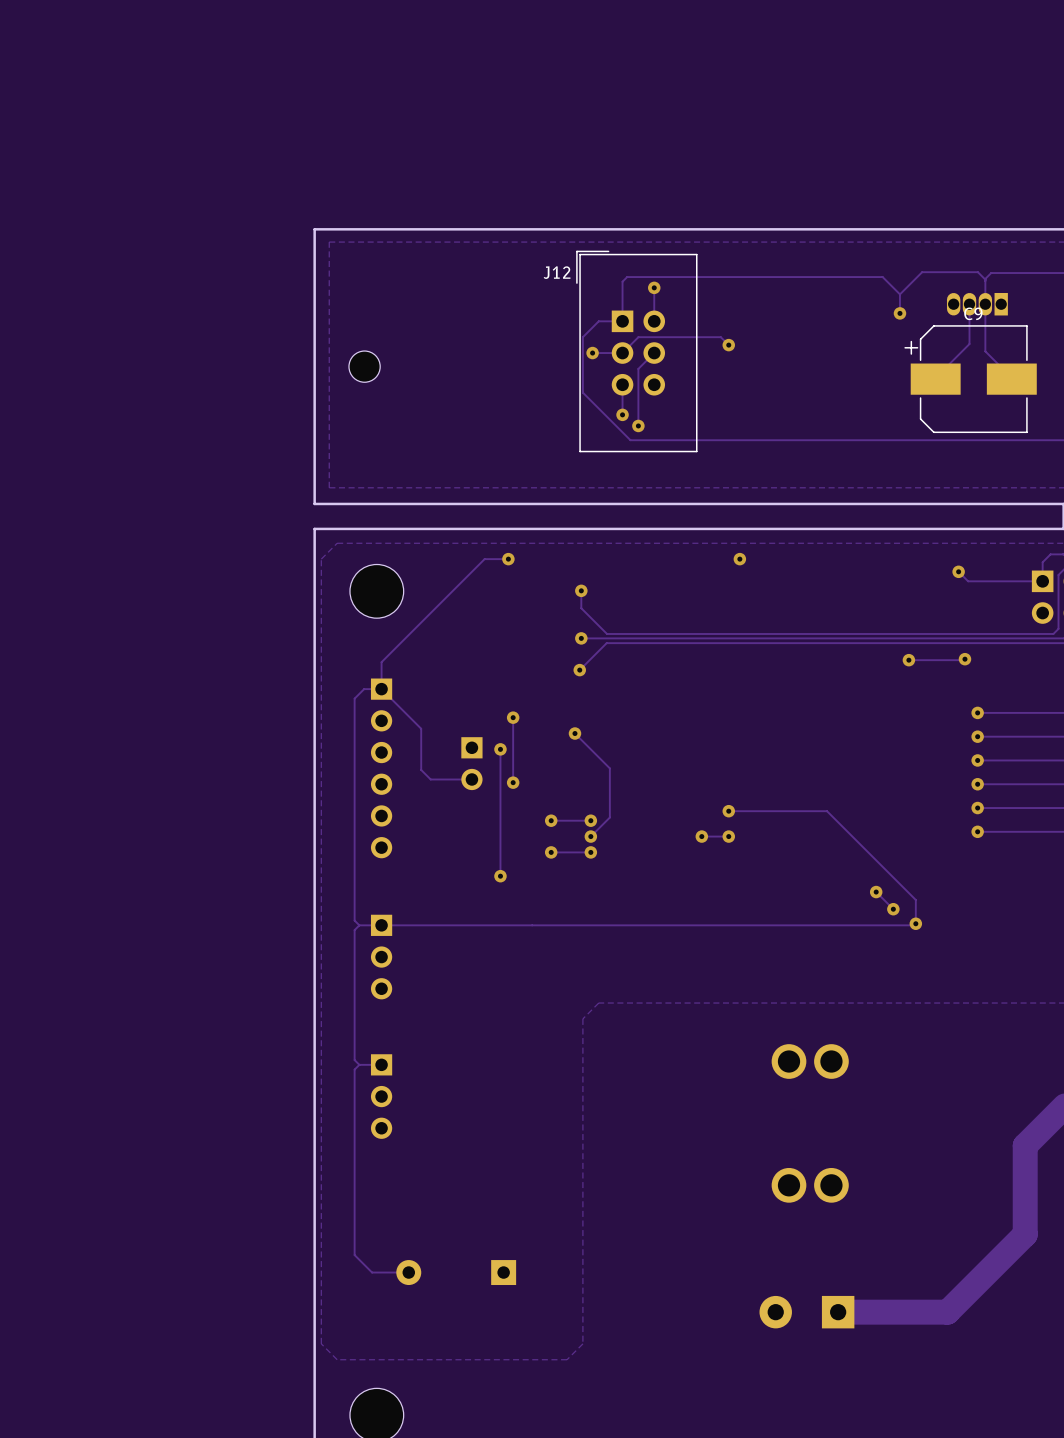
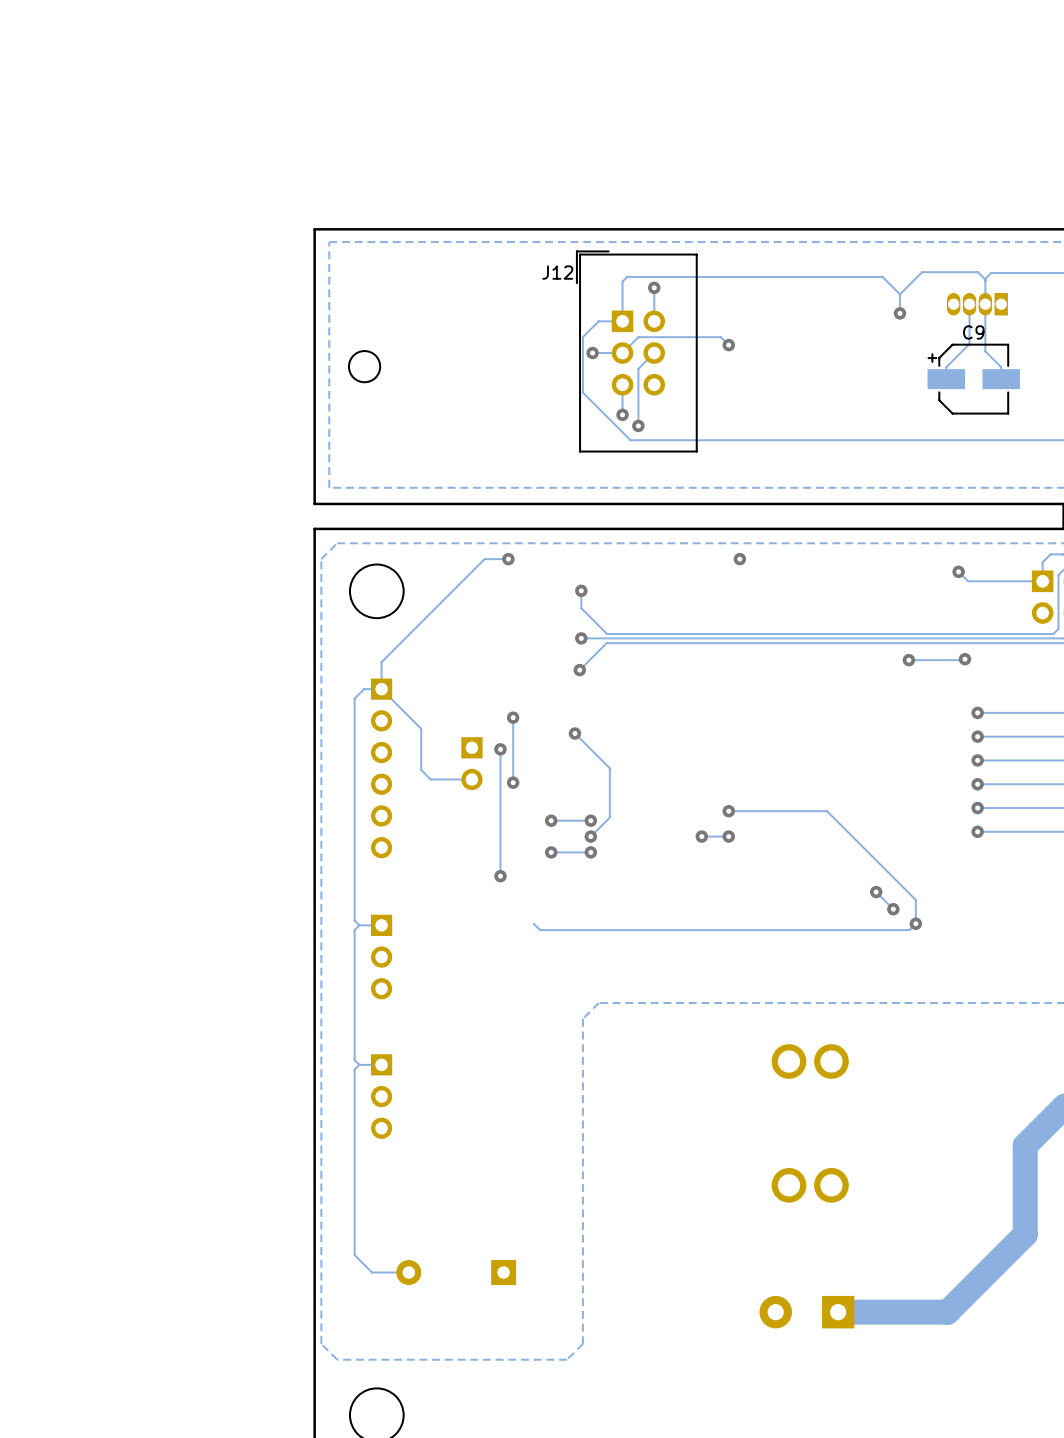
C9 footprint: [904, 325, 1037, 434] -> [927, 343, 1020, 415]
track: (914, 925) (381, 925) -> (914, 925) (909, 930) (540, 930) (533, 923)

